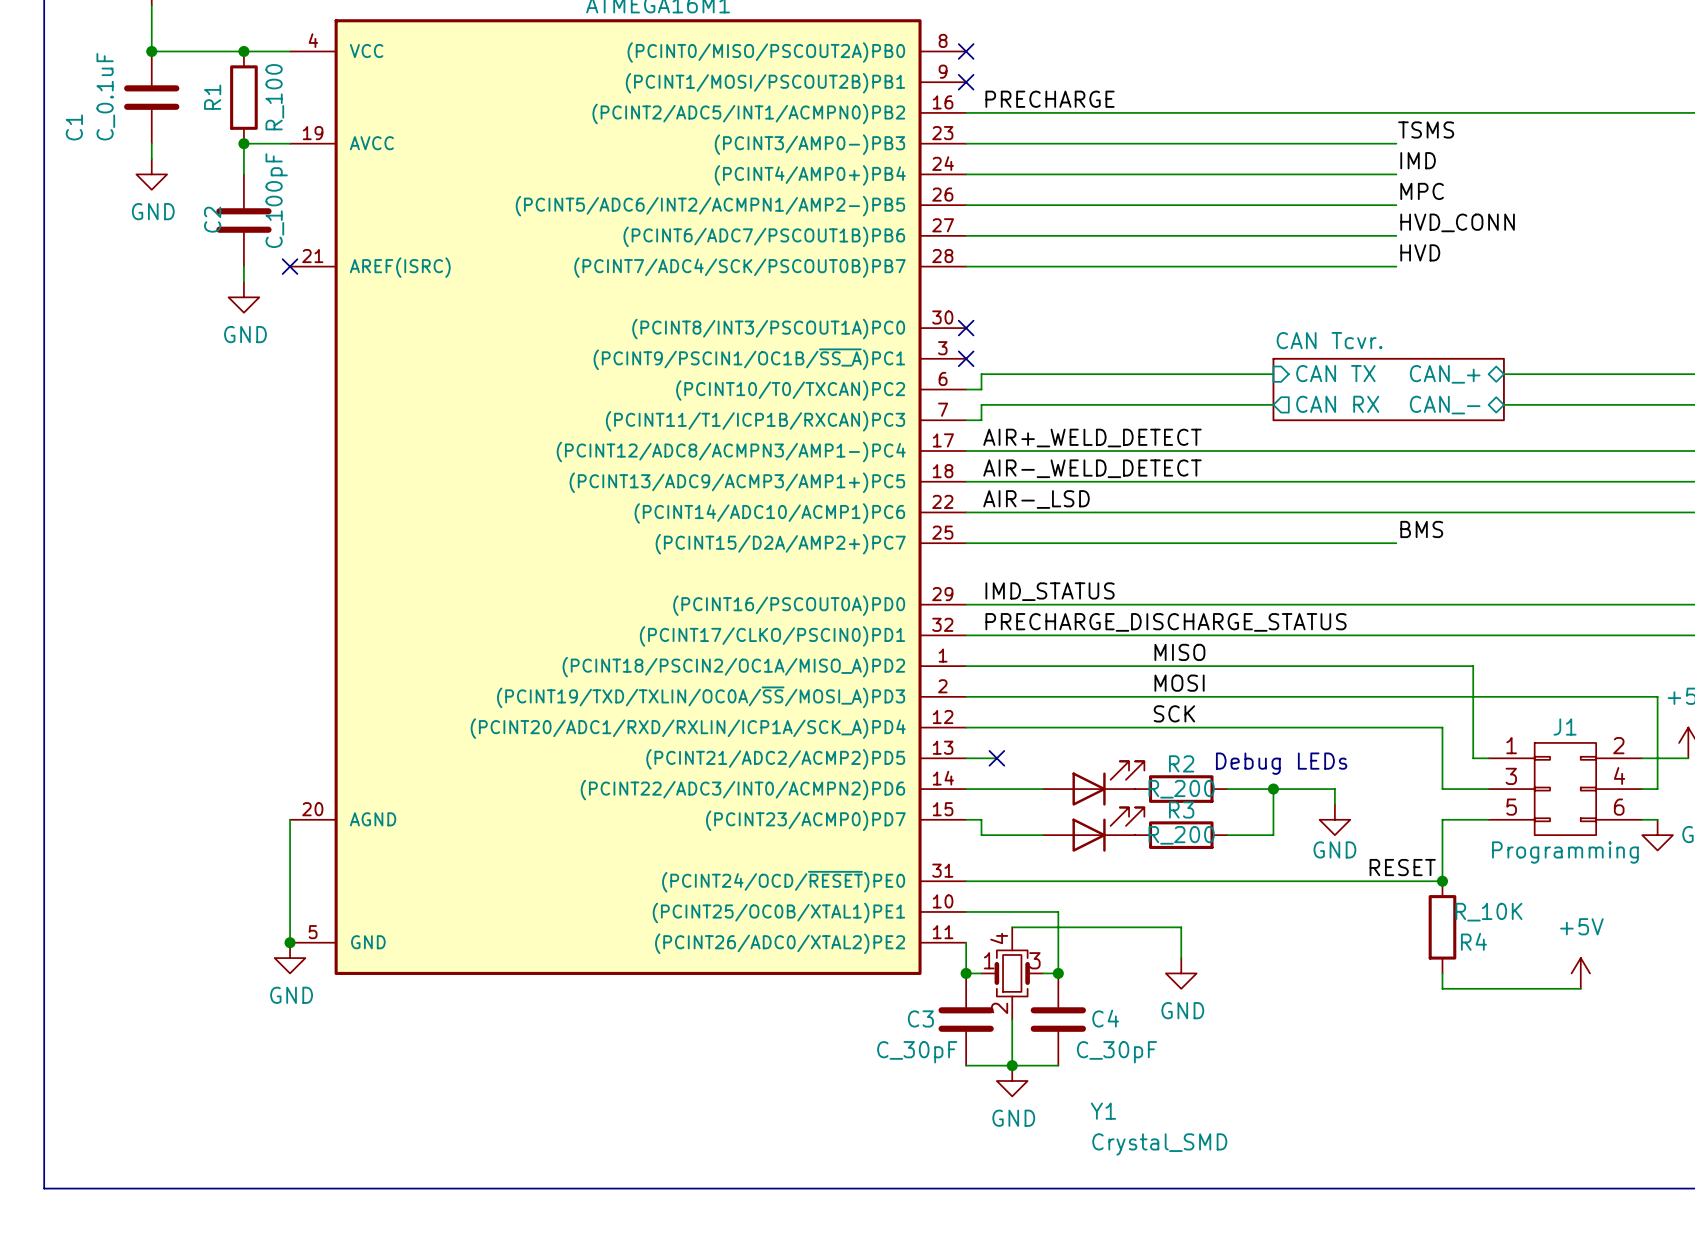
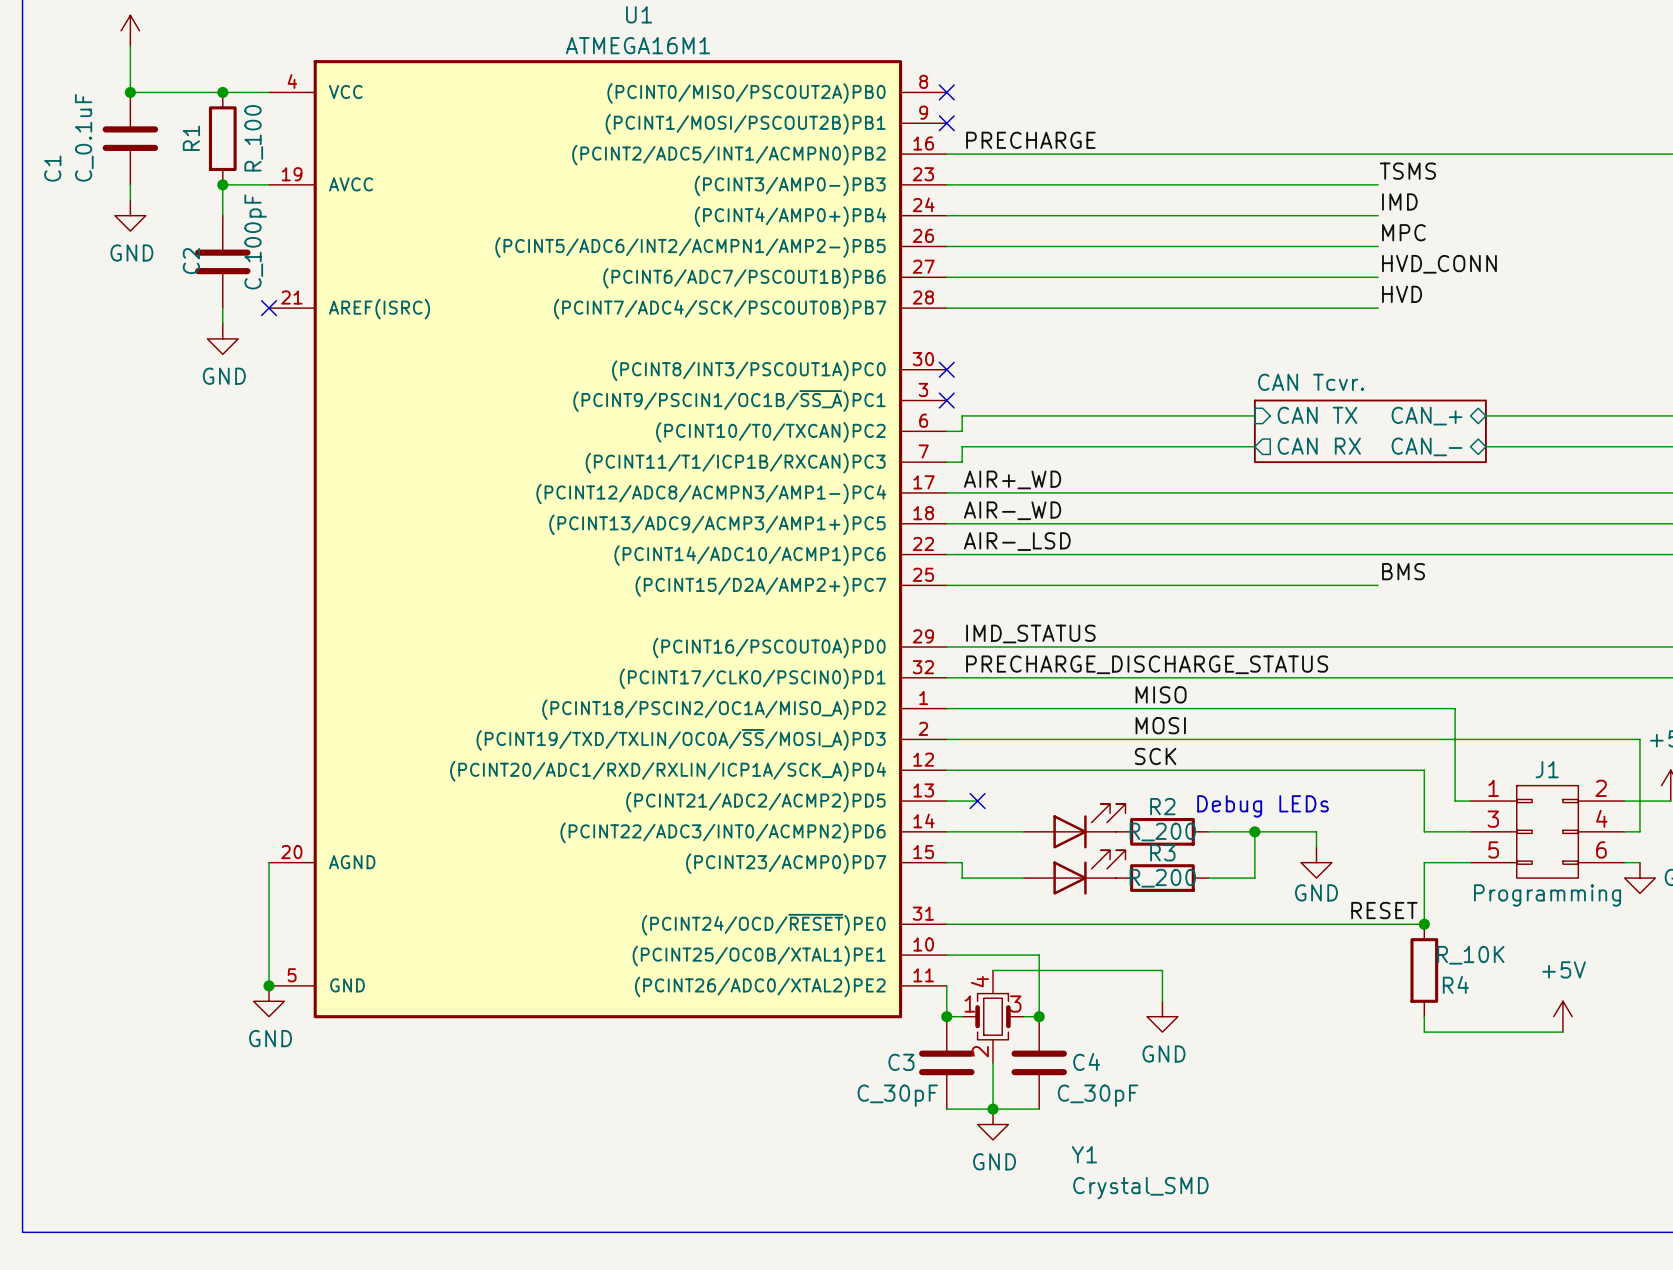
label: AIR+_WELD_DETECT (1092, 438) -> AIR+_WD (1012, 479)
label: AIR-_WELD_DETECT (1092, 468) -> AIR-_WD (1012, 510)

